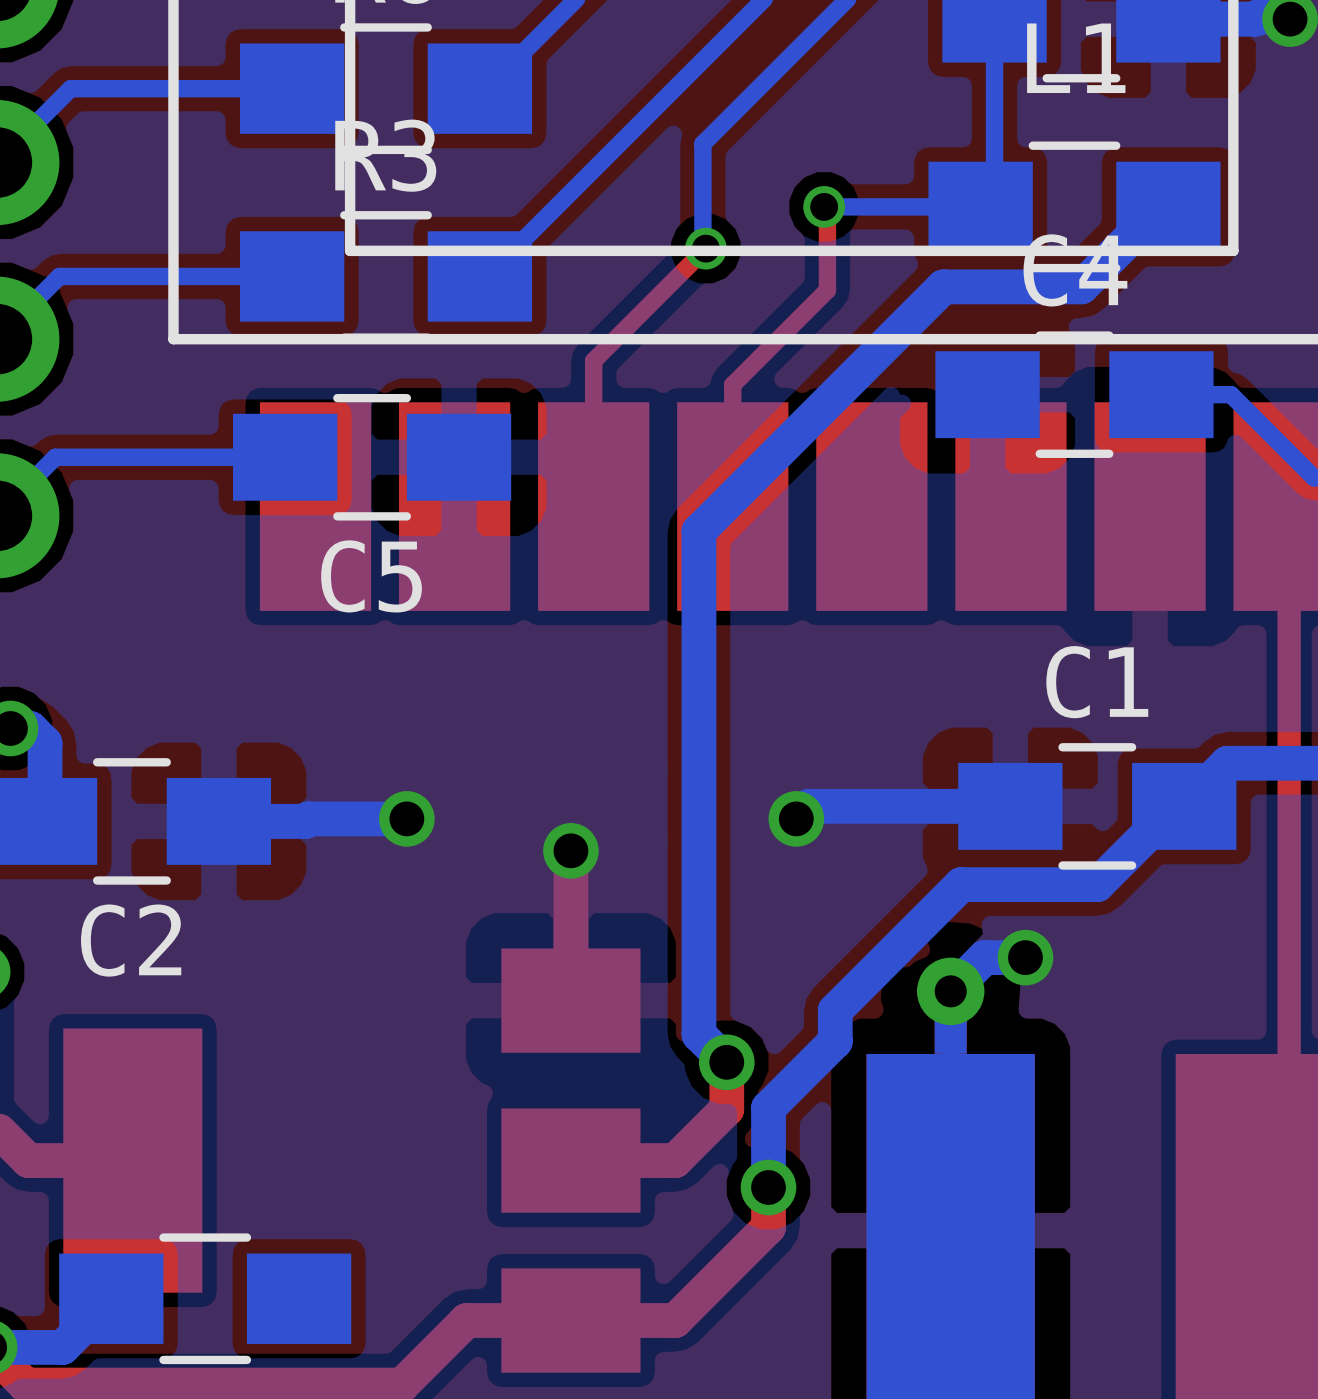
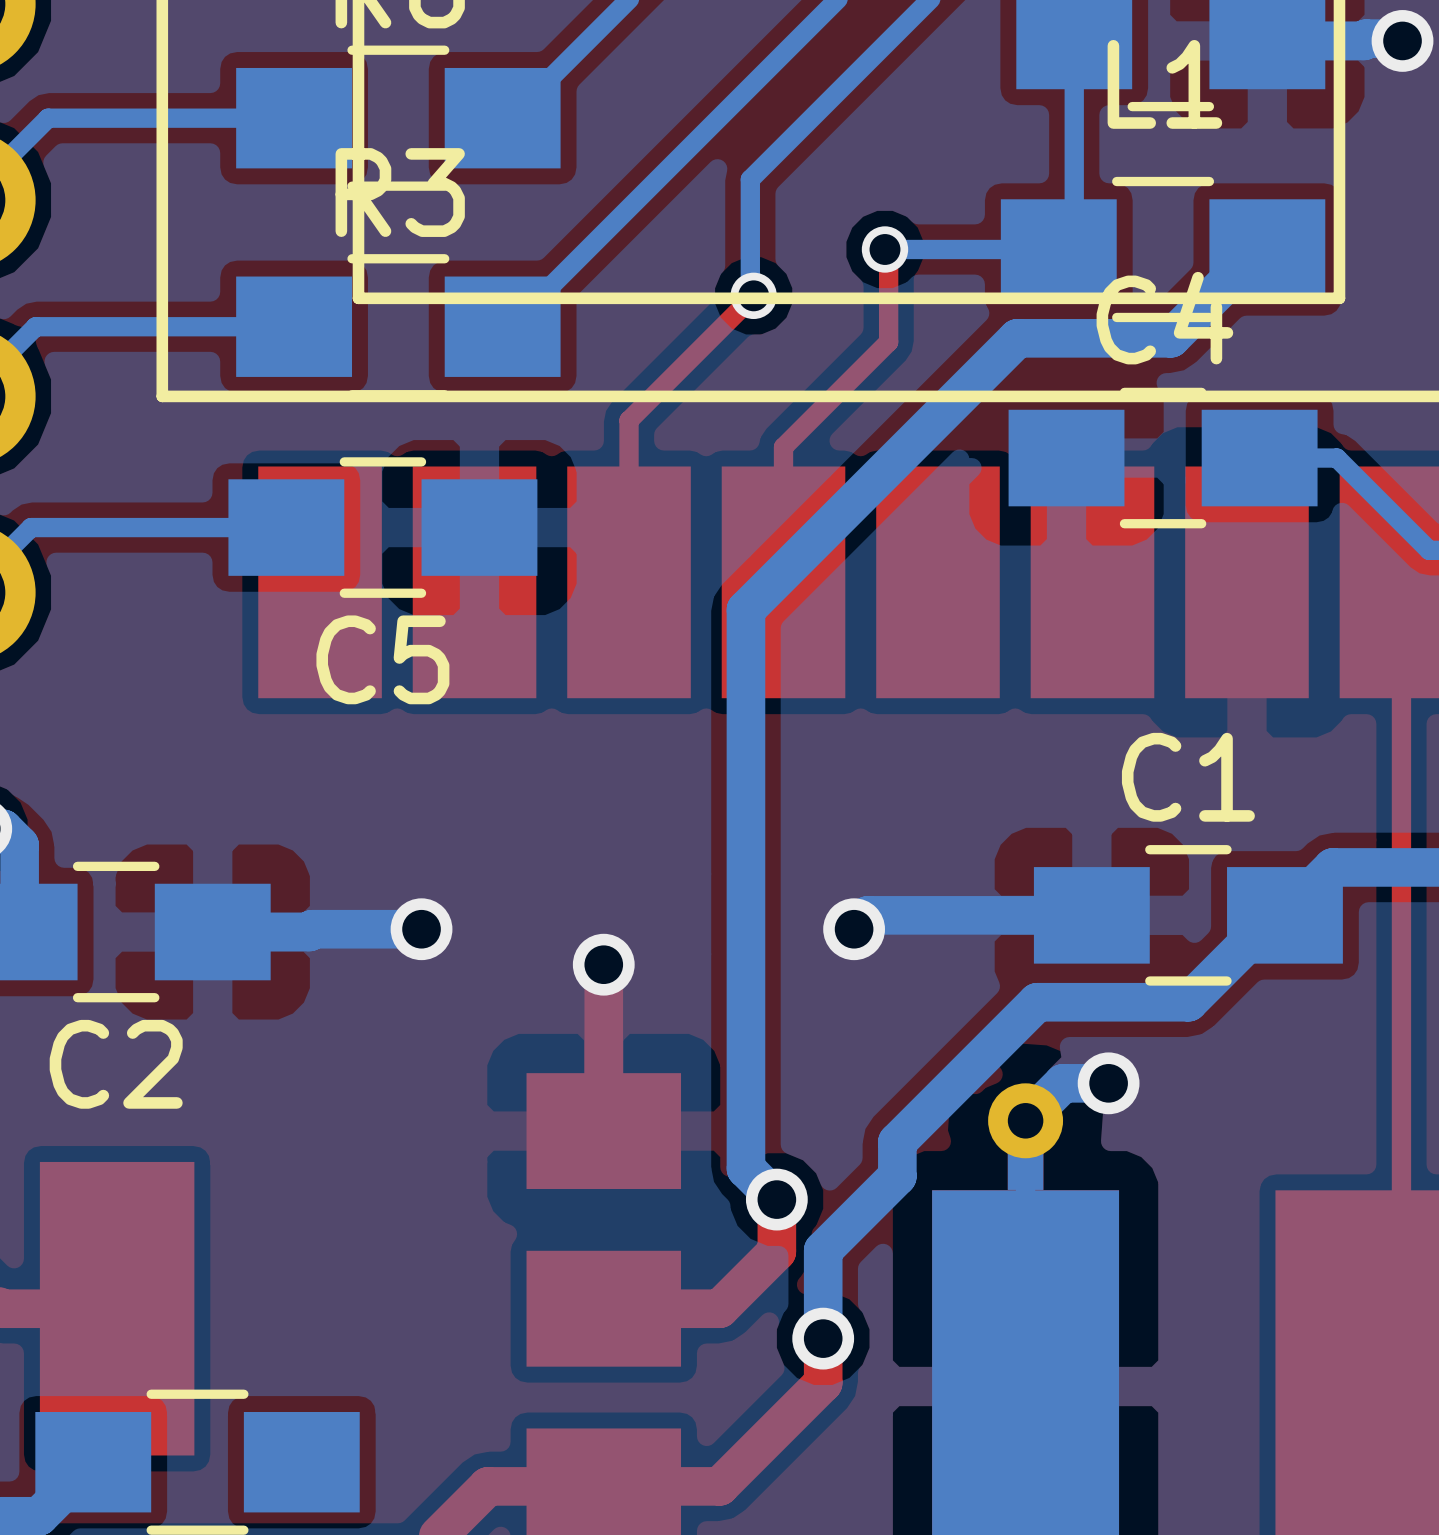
top track width: thick (1289, 506) (1289, 1196) -> thin (1401, 582) (1401, 1348)

